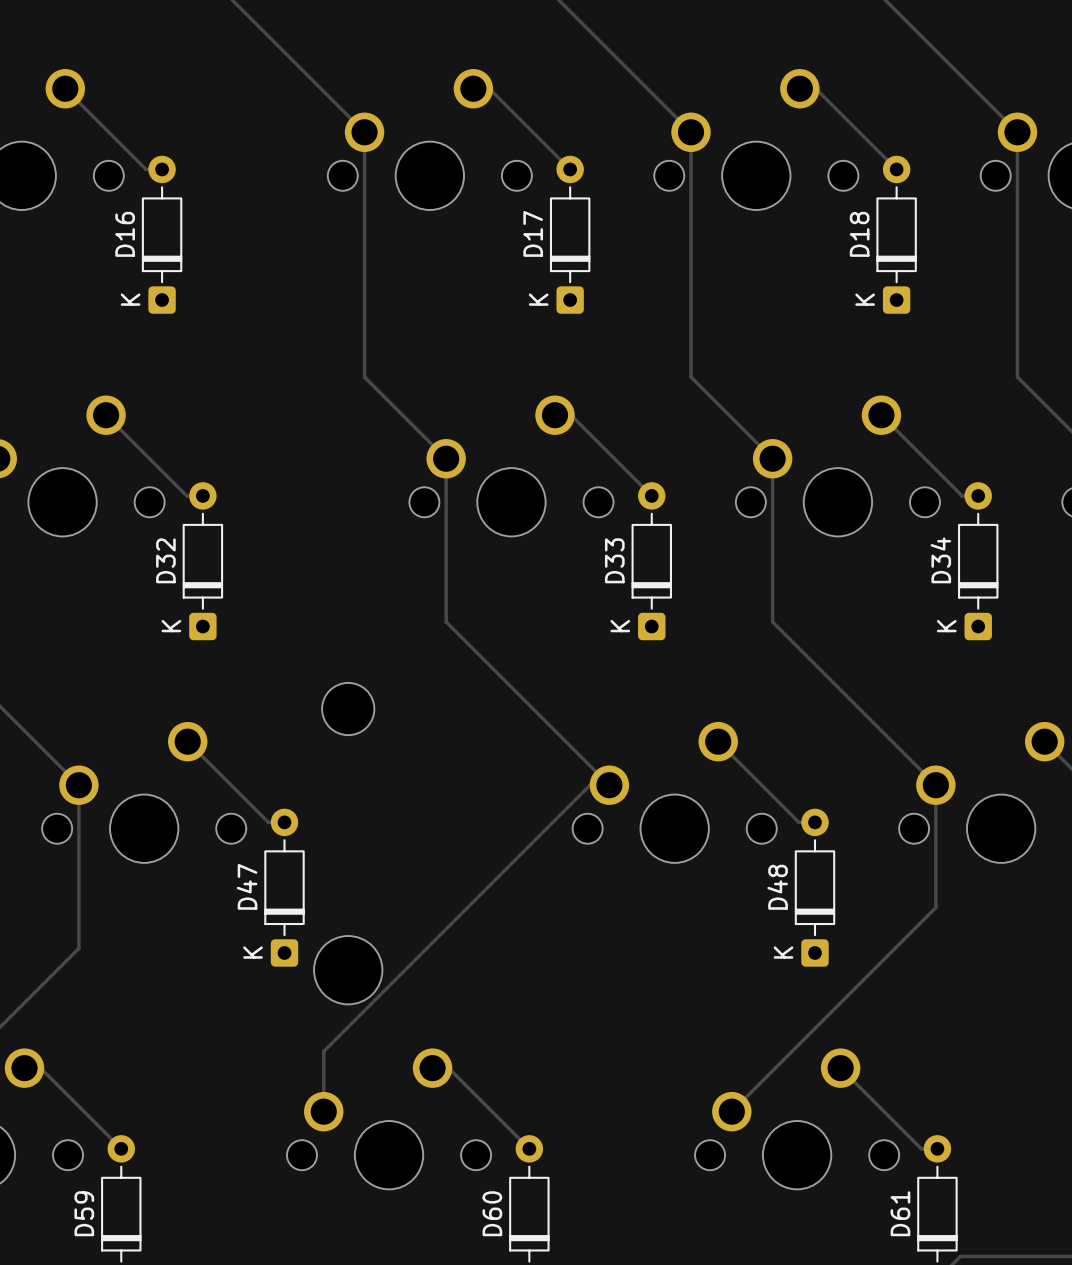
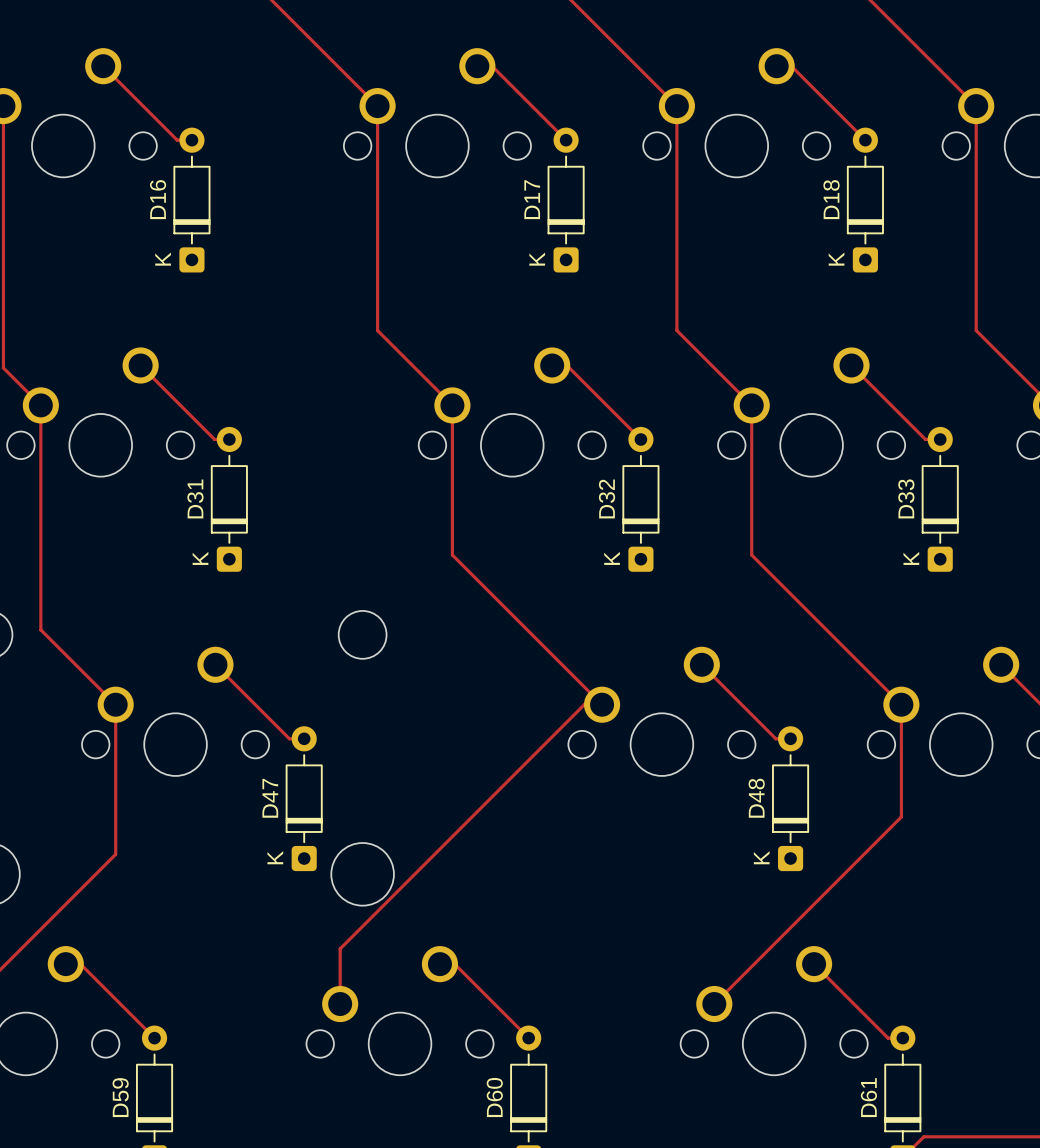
D32 name: D32 (165, 560) -> D31 (195, 498)
D33 name: D33 (614, 560) -> D32 (607, 498)
D34 name: D34 (940, 560) -> D33 (906, 498)

